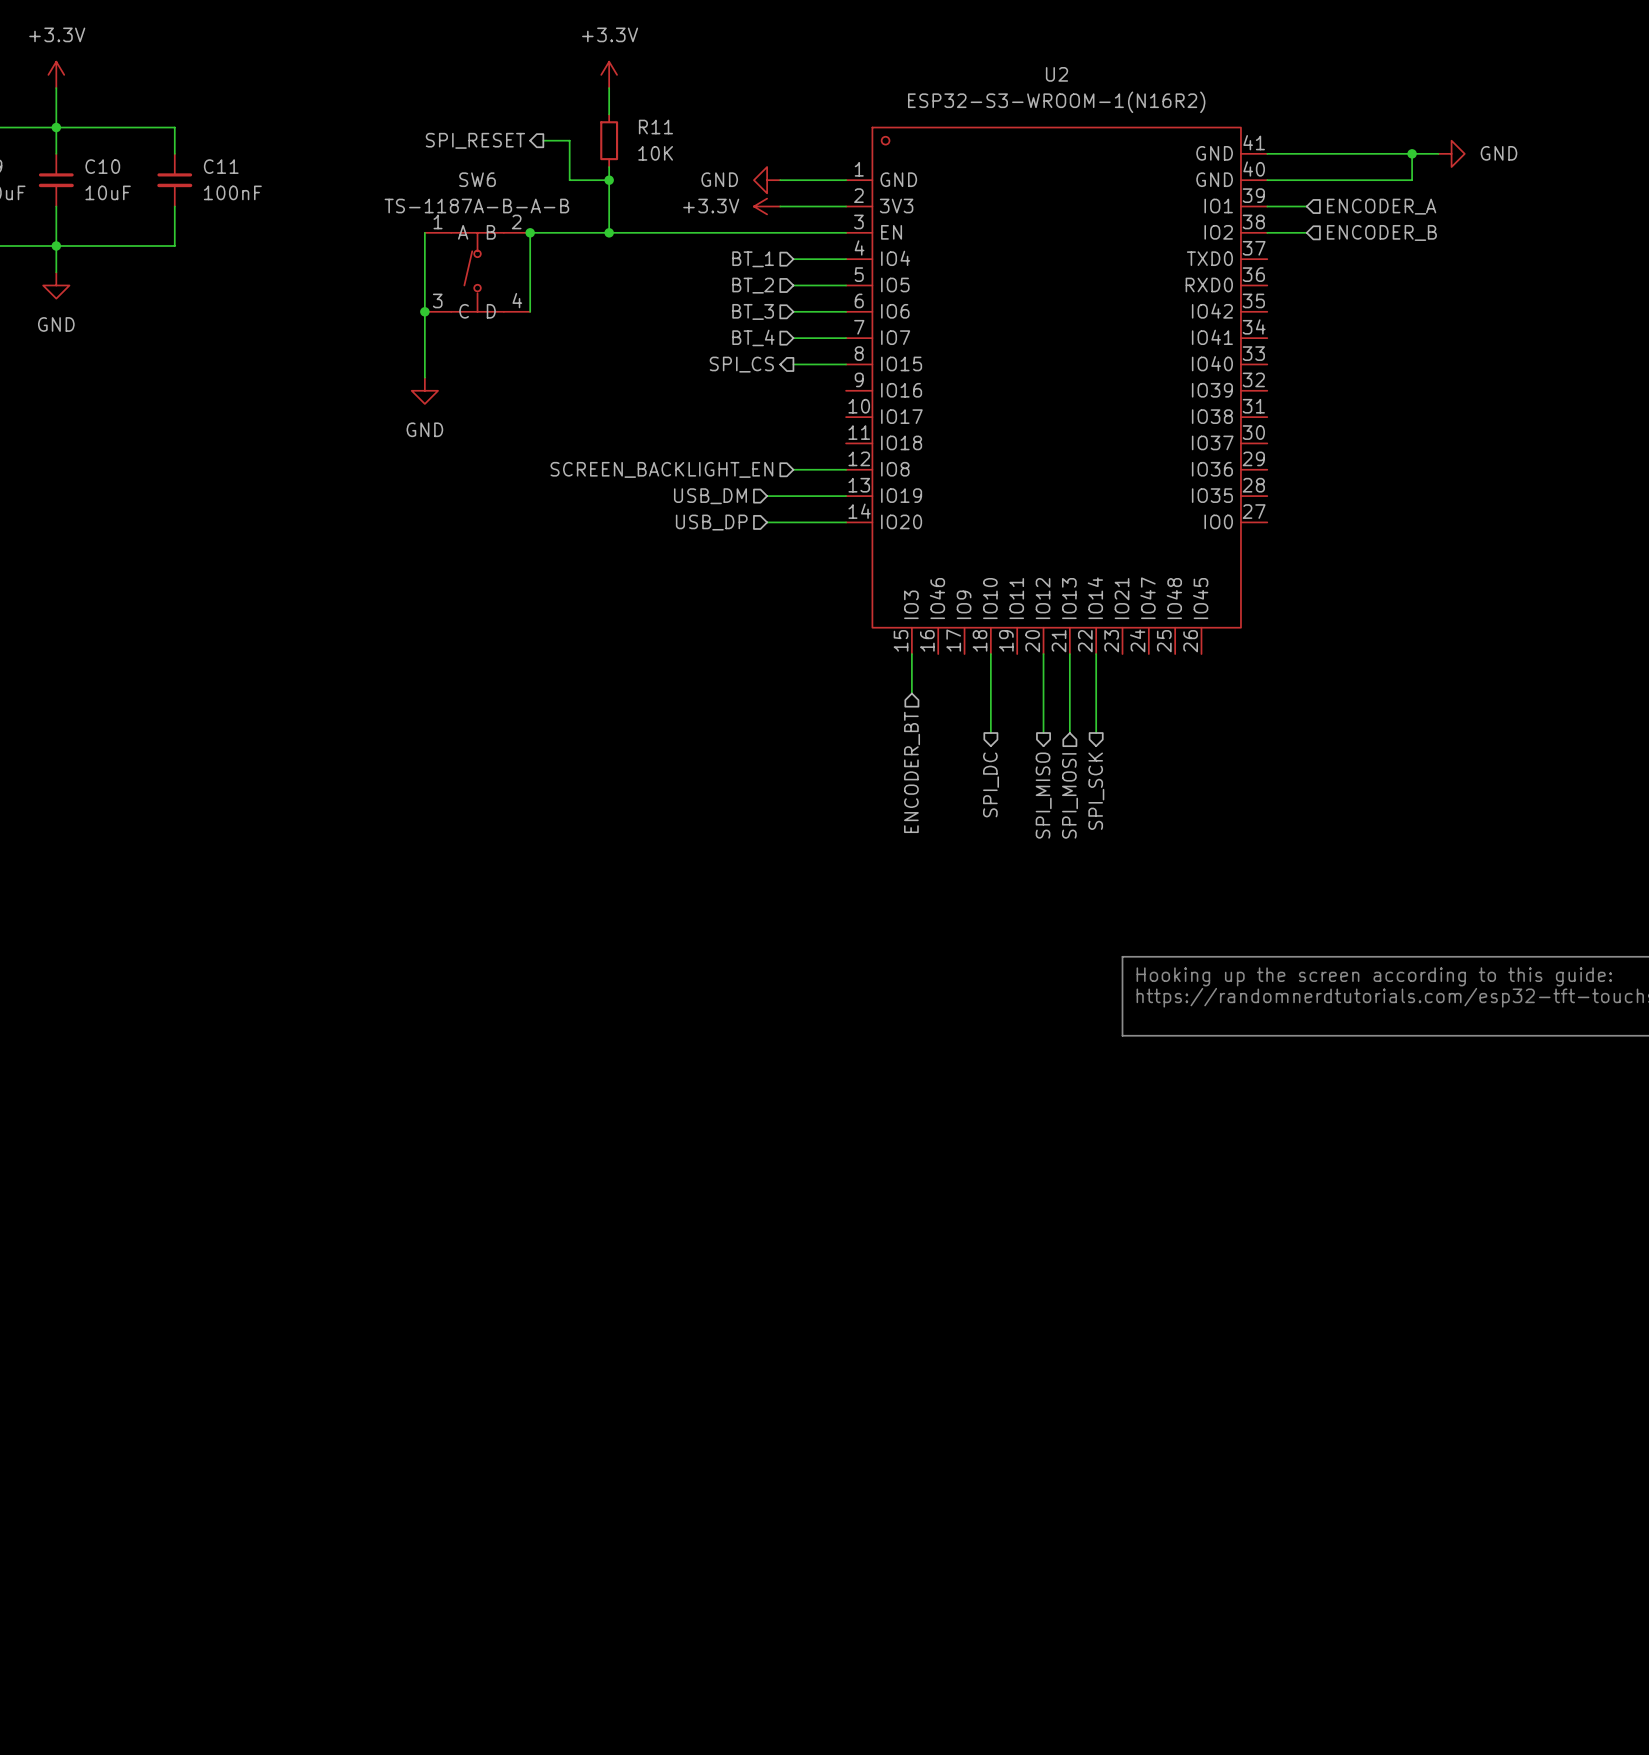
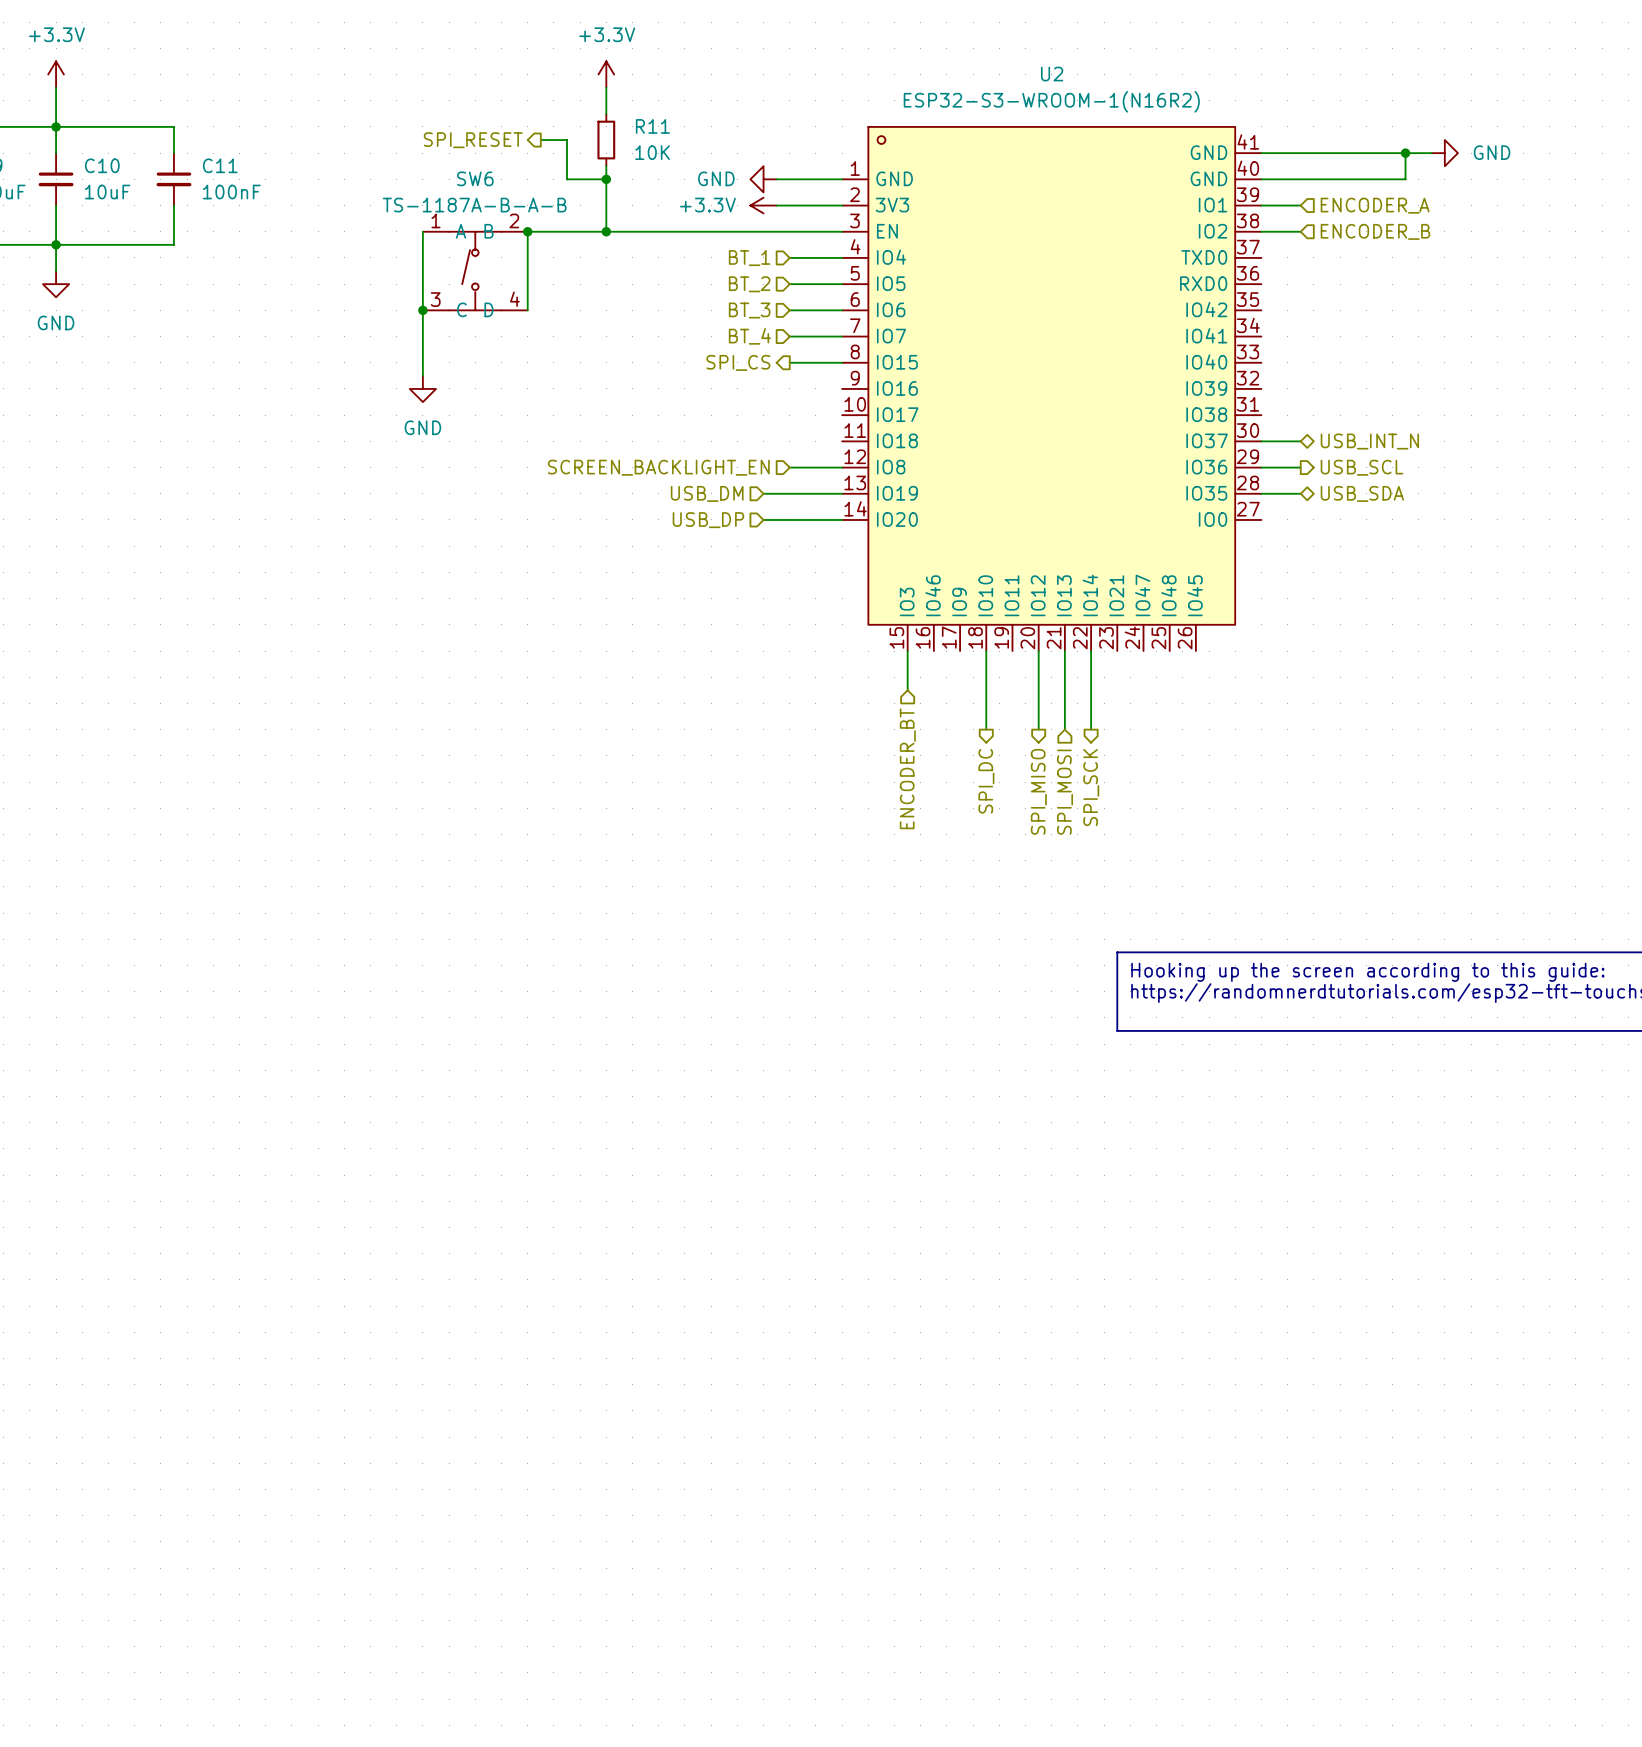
wire: none -> (1261, 441) (1300, 441)
hierarchical label: none -> USB_INT_N (1369, 441)
wire: none -> (1261, 467) (1300, 467)
hierarchical label: none -> USB_SCL (1362, 467)
wire: none -> (1261, 493) (1300, 493)
hierarchical label: none -> USB_SDA (1362, 493)

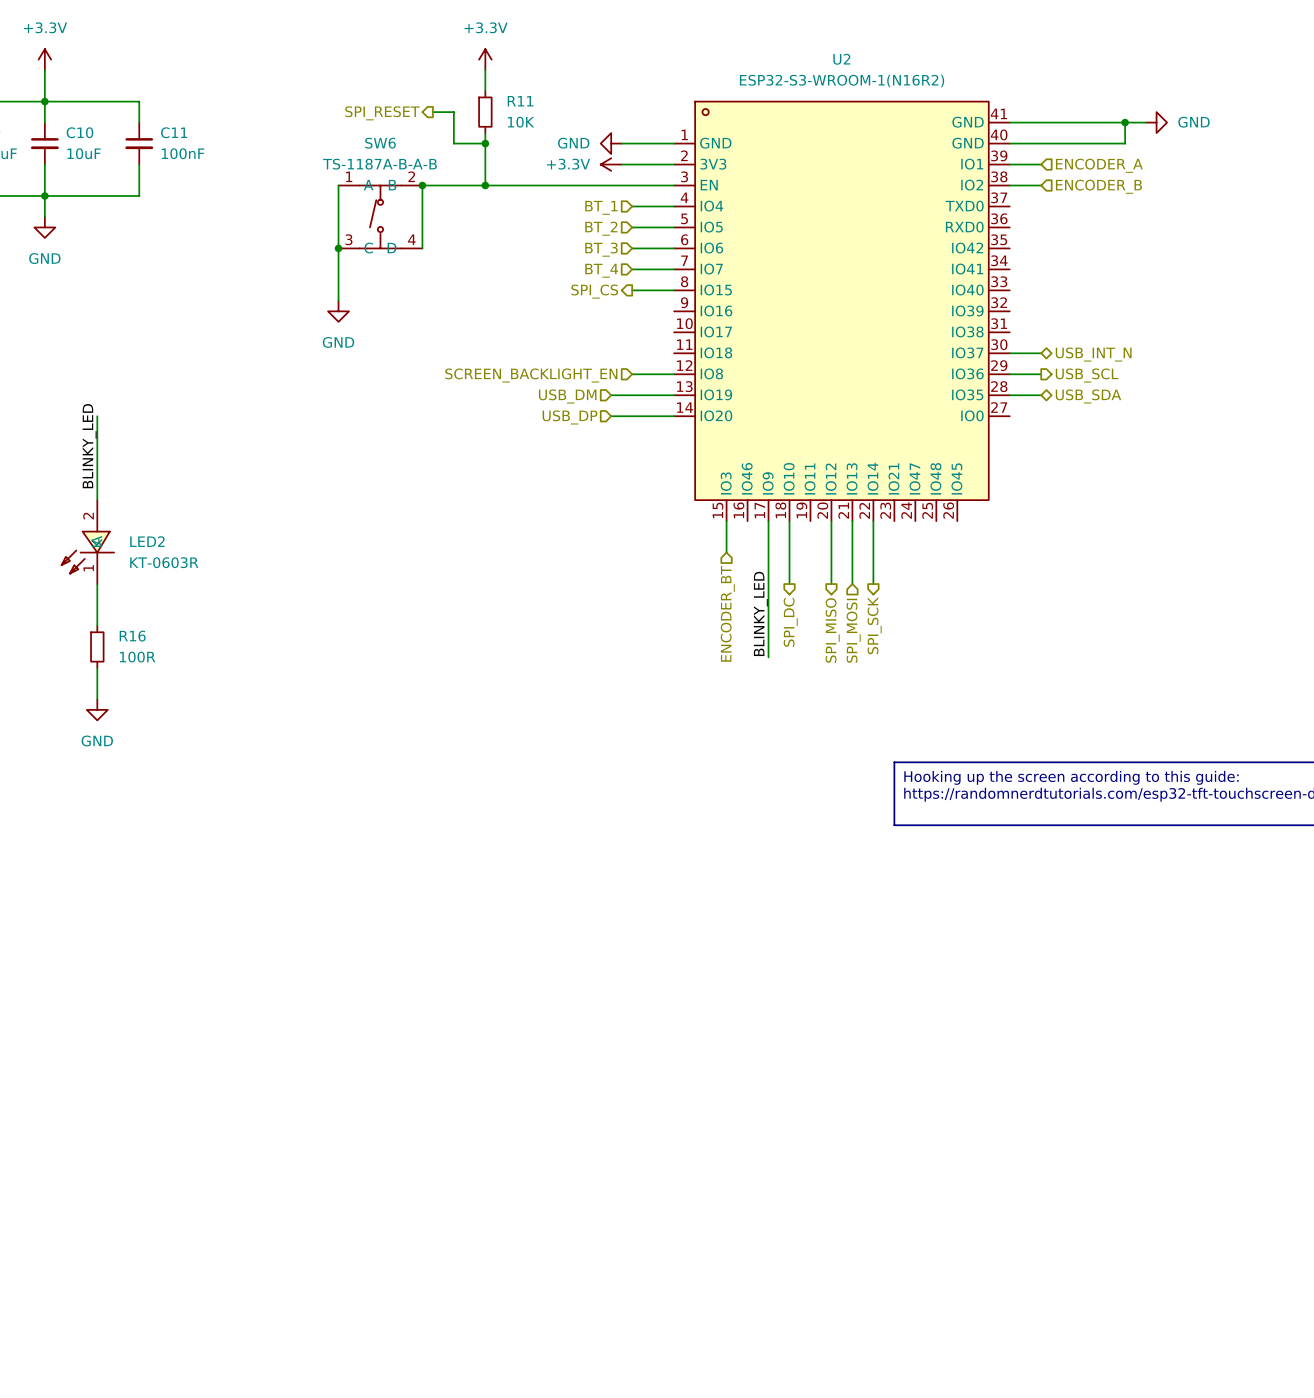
wire: none -> (97, 416) (97, 500)
label: none -> BLINKY_LED (89, 446)
wire: none -> (768, 521) (768, 657)
LED2: none -> KT-0603R (87, 542)
wire: none -> (97, 584) (97, 625)
label: none -> BLINKY_LED (760, 613)
R16: none -> 100R (97, 646)
wire: none -> (97, 667) (97, 699)
power symbol: none -> GND (97, 709)

